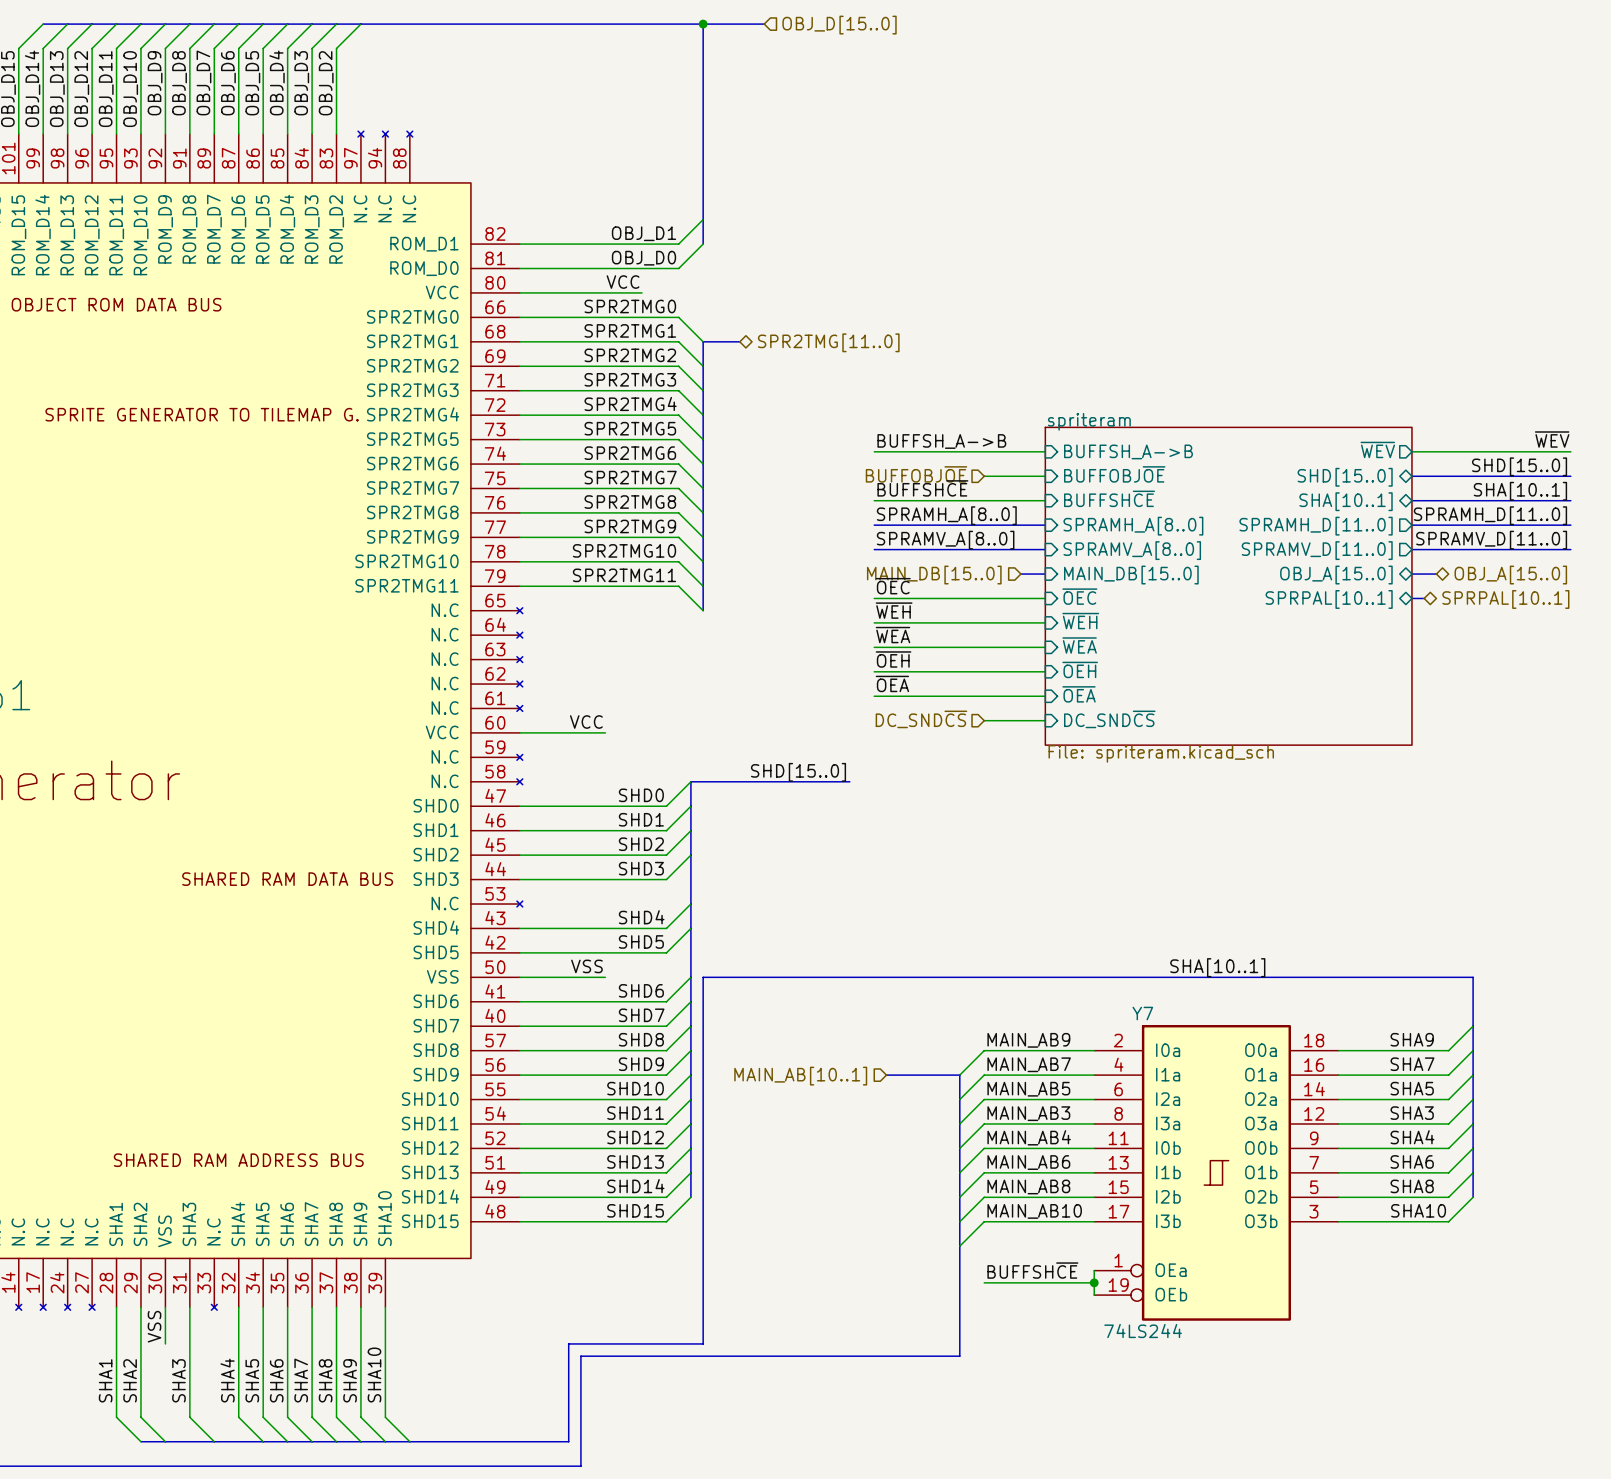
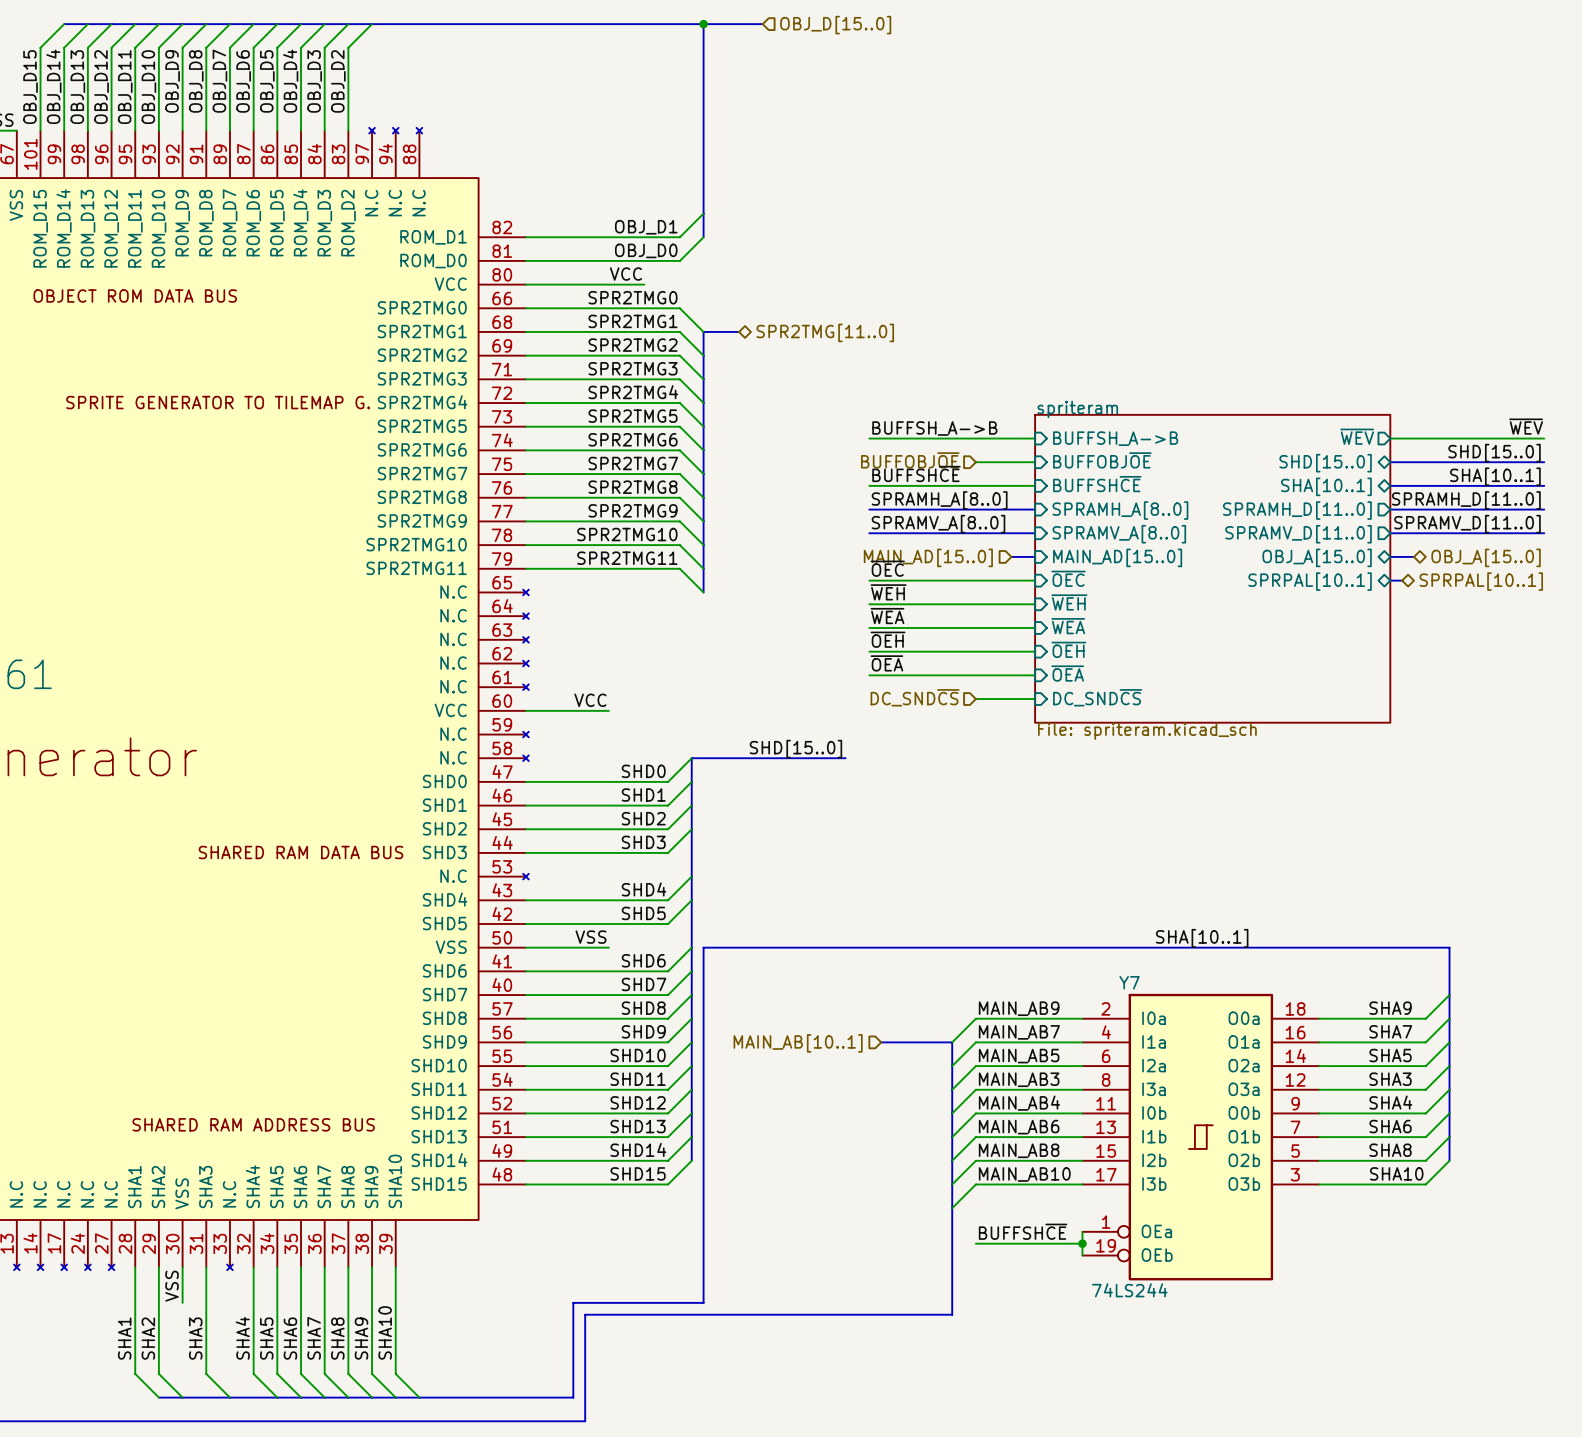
hierarchical label: MAIN_DB[15..0] (934, 575) -> MAIN_AD[15..0] (928, 557)
sheet pin: MAIN_DB[15..0] (1131, 575) -> MAIN_AD[15..0] (1117, 557)

